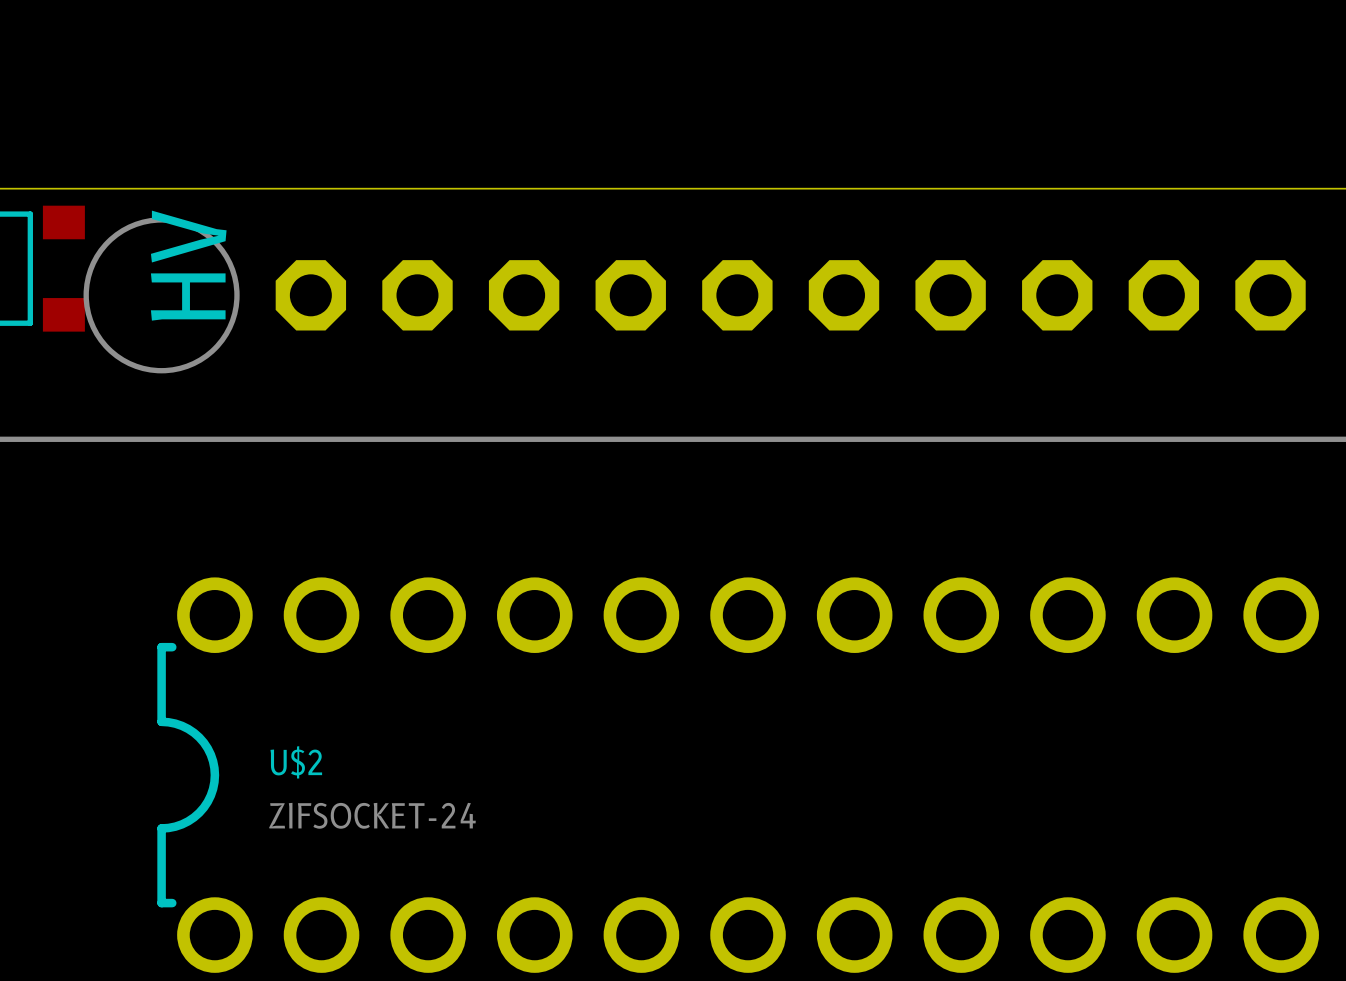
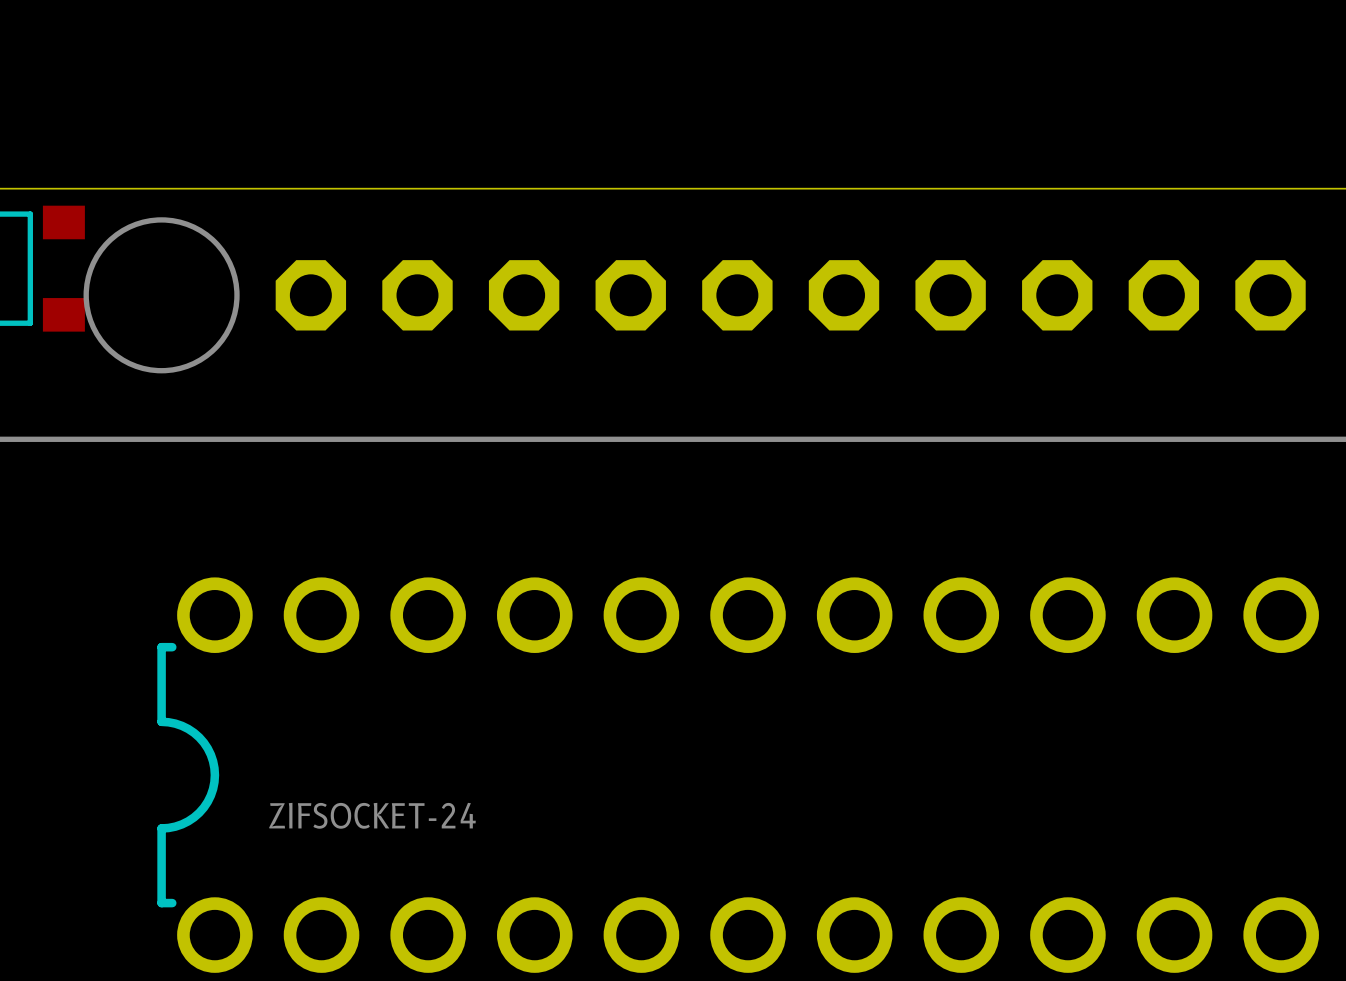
text: HV (188, 265) -> none
U$2 name: U$2 (296, 762) -> none

